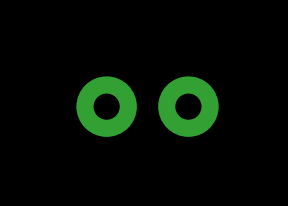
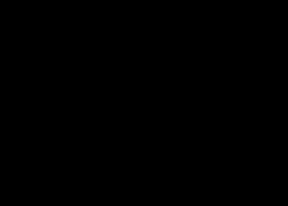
part: (147, 106) -> none

